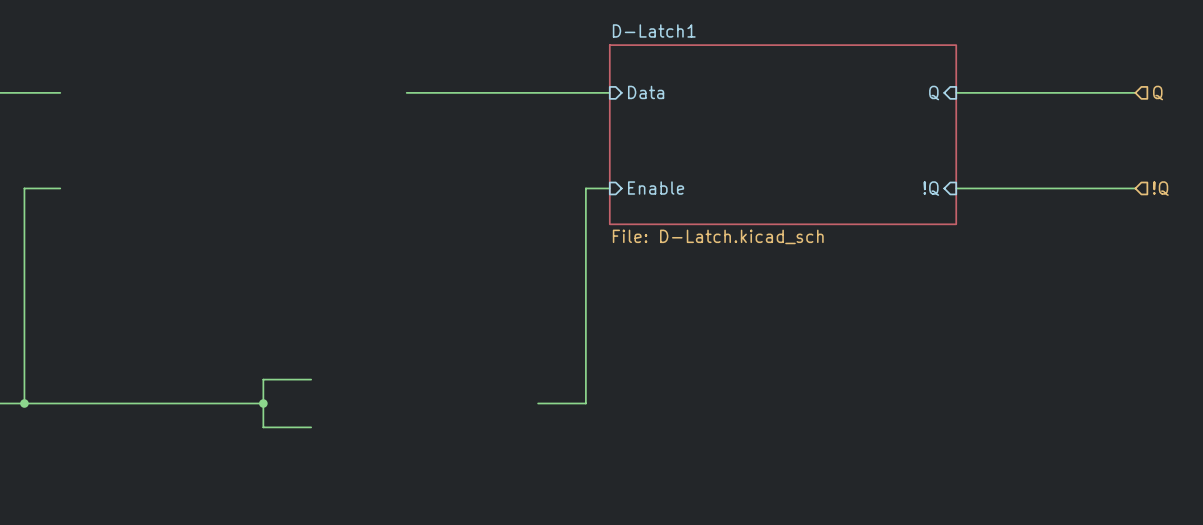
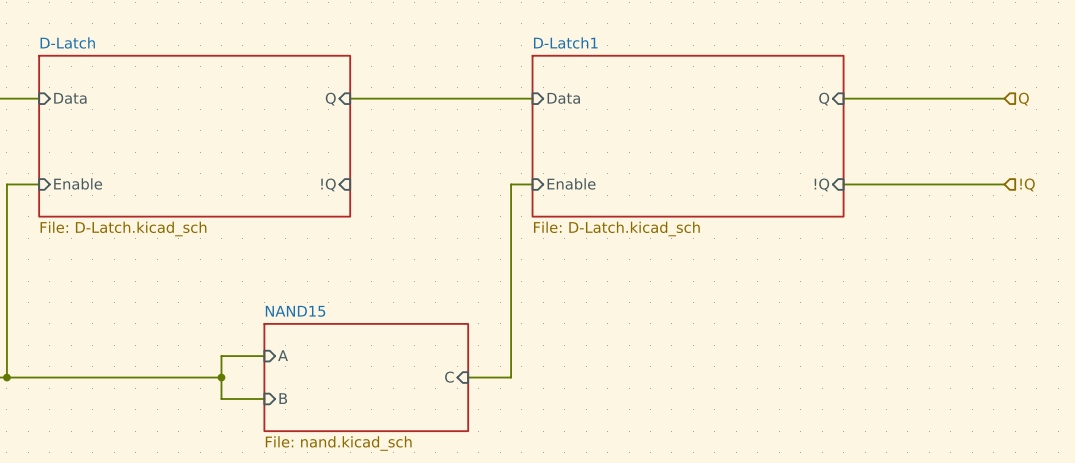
sheet pin: none -> Data (70, 98)
sheet pin: none -> Q (330, 99)
sheet D-Latch: none -> File: D-Latch.kicad_sch (194, 136)
sheet pin: none -> Enable (78, 183)
sheet pin: none -> !Q (328, 184)
sheet pin: none -> A (283, 355)
sheet NAND15: none -> File: nand.kicad_sch (366, 377)
sheet pin: none -> C (449, 377)
sheet pin: none -> B (283, 398)

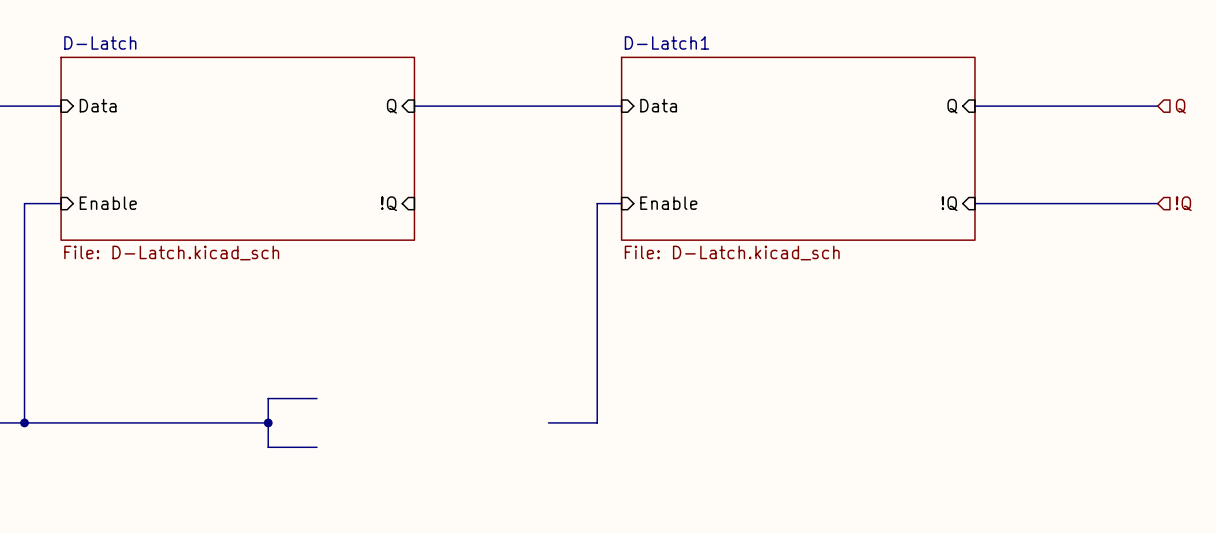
sheet pin: A (283, 355) -> none
sheet NAND15: File: nand.kicad_sch (366, 377) -> none
sheet pin: C (449, 377) -> none
sheet pin: B (283, 398) -> none

